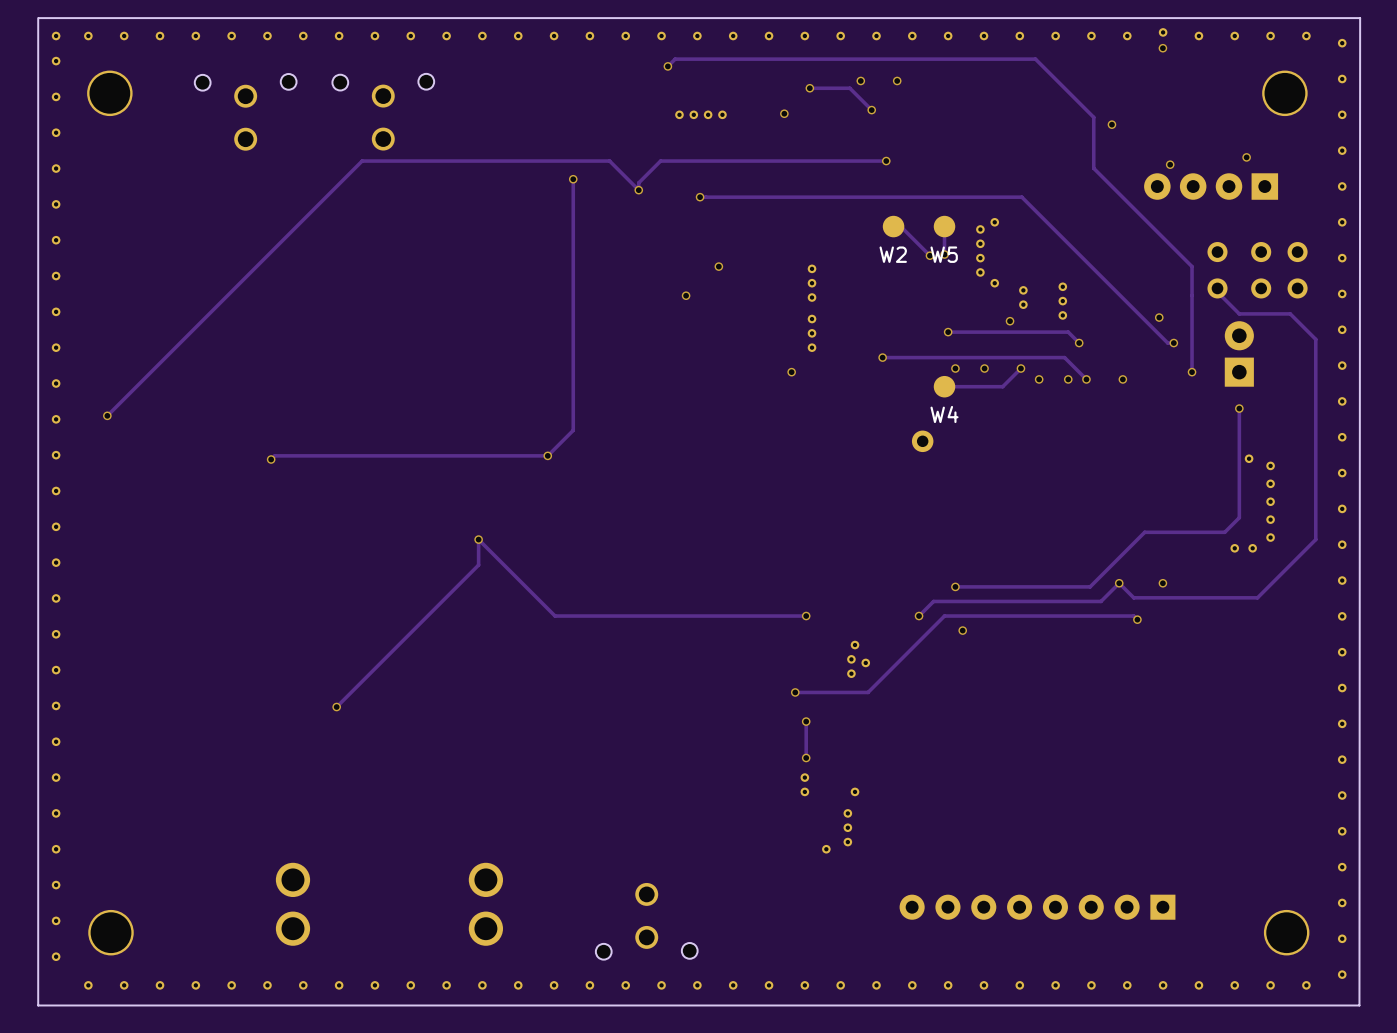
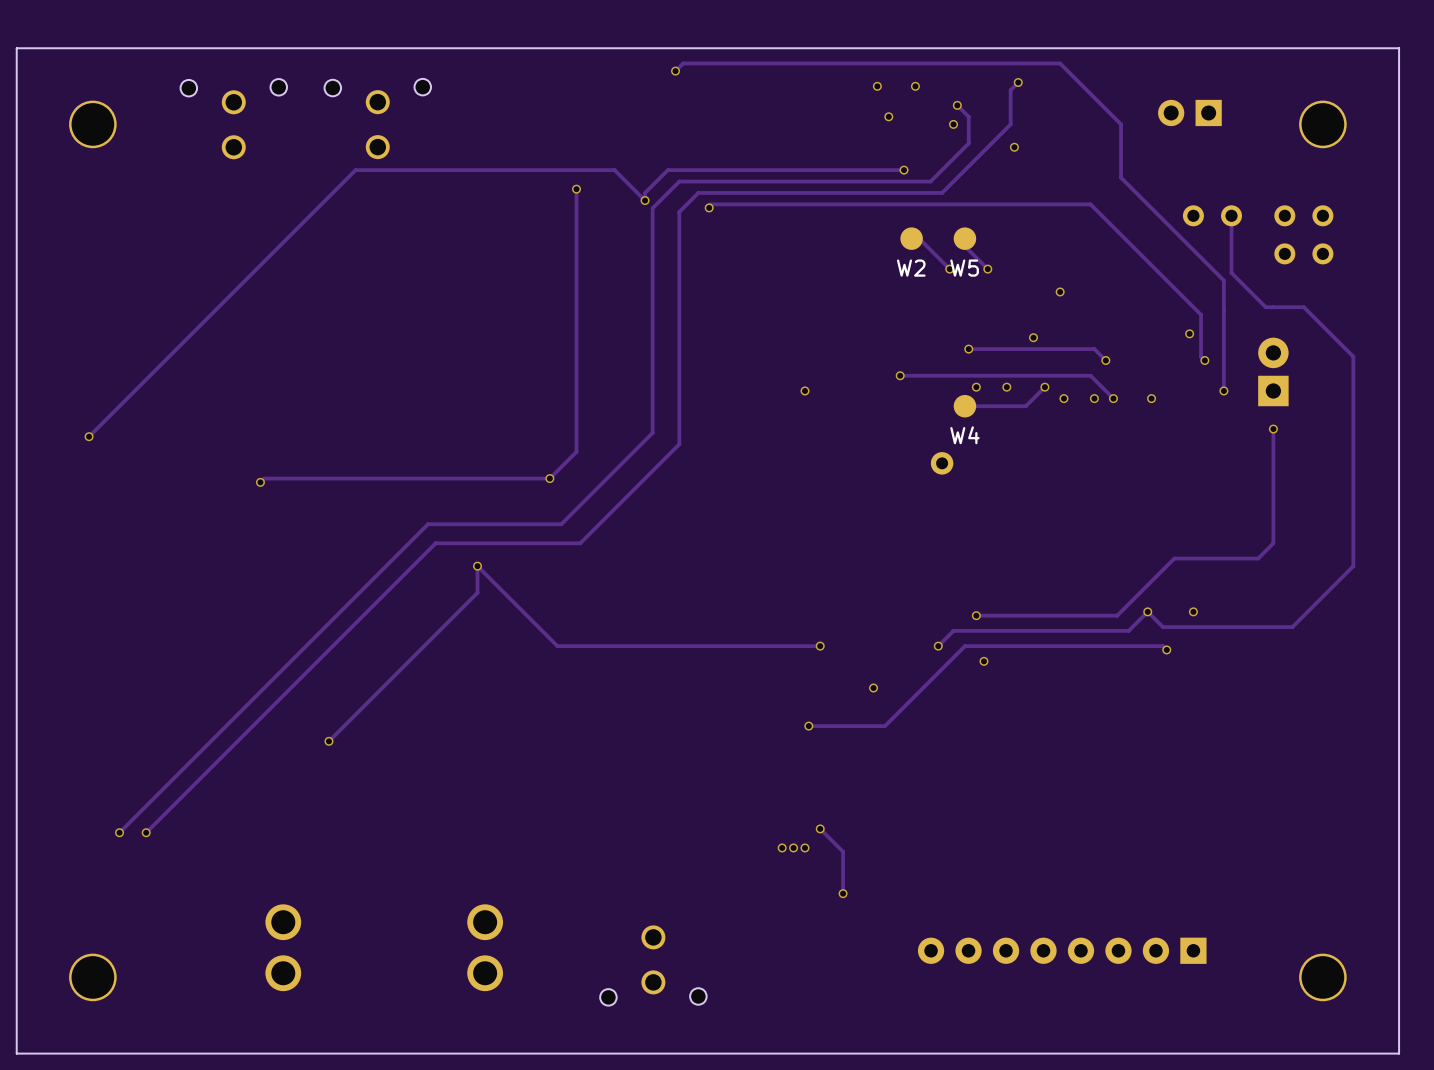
board edge: (38, 18) (1360, 18) (1359, 1005) -> (16, 48) (1399, 48) (1399, 1053)
board edge: (38, 18) (38, 44) -> none
part: (1163, 32) -> none
part: (56, 36) -> none
part: (88, 36) -> none
part: (124, 36) -> none
part: (160, 36) -> none
part: (195, 36) -> none
part: (231, 36) -> none
part: (267, 36) -> none
part: (303, 36) -> none
part: (339, 36) -> none
part: (374, 36) -> none
part: (410, 36) -> none
part: (446, 36) -> none
part: (482, 36) -> none
part: (518, 36) -> none
part: (554, 36) -> none
part: (589, 36) -> none
part: (625, 36) -> none
part: (661, 36) -> none
part: (697, 36) -> none
part: (733, 36) -> none
part: (769, 36) -> none
part: (804, 36) -> none
part: (840, 36) -> none
part: (876, 36) -> none
part: (912, 36) -> none
part: (948, 36) -> none
part: (983, 36) -> none
part: (1019, 36) -> none
part: (1055, 36) -> none
part: (1091, 36) -> none
part: (1127, 36) -> none
part: (1198, 36) -> none
part: (1234, 36) -> none
part: (1270, 36) -> none
part: (1306, 36) -> none
part: (1342, 43) -> none
via: (1162, 48) -> none
part: (56, 61) -> none
track: none -> (1018, 82) (1010, 90) (1010, 124) (942, 192) (698, 192) (679, 212) (679, 444) (580, 543) (435, 543) (146, 832)
via: none -> (1018, 82)
part: (1342, 78) -> none
track: (809, 88) (849, 88) (871, 110) -> none
via: (809, 88) -> none
part position: (109, 93) -> (92, 124)
part position: (1284, 93) -> (1322, 124)
part: (56, 96) -> none
track: none -> (957, 105) (968, 116) (968, 143) (930, 181) (679, 181) (652, 208) (652, 432) (561, 524) (428, 524) (119, 832)
via: none -> (957, 105)
part: none -> (1189, 112)
via: (784, 113) -> none
part: (679, 114) -> none
part: (693, 114) -> none
part: (708, 114) -> none
part: (722, 114) -> none
part: (1342, 114) -> none
via: none -> (953, 124)
via: (1111, 124) -> none
part: (56, 132) -> none
via: none -> (1014, 147)
part: (1342, 150) -> none
via: (1246, 157) -> none
via: (1170, 164) -> none
part: (56, 168) -> none
part: (1211, 186) -> none
part: (1342, 186) -> none
track: (700, 197) (1021, 197) (1167, 343) (1173, 343) -> (709, 204) (1090, 204) (1201, 314) (1201, 356) (1204, 360)
part: (56, 204) -> none
part: none -> (1212, 215)
part: none -> (1303, 215)
part: (994, 222) -> none
part: (1342, 222) -> none
part: (980, 229) -> none
track: (944, 233) (944, 254) -> (964, 246) (987, 269)
part: (56, 240) -> none
part: (980, 243) -> none
part position: (1279, 252) -> (1303, 253)
via position: (944, 254) -> (987, 269)
part: (980, 258) -> none
part: (1342, 258) -> none
via: (718, 266) -> none
part: (812, 268) -> none
part: (1217, 270) -> none
part: (980, 272) -> none
part: (56, 276) -> none
via: none -> (1060, 291)
part: (812, 283) -> none
part: (994, 283) -> none
part: (1062, 286) -> none
track: (1217, 288) (1217, 292) (1239, 313) (1290, 313) -> (1231, 215) (1231, 272) (1265, 307) (1303, 307) (1326, 330)
part: (1279, 288) -> none
part: (1023, 290) -> none
part: (1342, 293) -> none
via: (686, 295) -> none
part: (812, 297) -> none
part: (1062, 301) -> none
part: (1023, 304) -> none
part: (56, 311) -> none
part: (1062, 315) -> none
part: (812, 319) -> none
part: (1342, 329) -> none
part: (812, 333) -> none
part: (56, 347) -> none
part: (812, 347) -> none
part: (1342, 365) -> none
part: (56, 383) -> none
part: (1342, 401) -> none
part: (56, 419) -> none
part: (1342, 437) -> none
part: (56, 455) -> none
part: (1249, 458) -> none
part: (1270, 465) -> none
part: (1342, 473) -> none
part: (1270, 483) -> none
part: (56, 490) -> none
part: (1270, 501) -> none
part: (1342, 508) -> none
part: (1270, 519) -> none
part: (56, 526) -> none
part: (1270, 537) -> none
part: (1342, 544) -> none
part: (1234, 548) -> none
part: (1252, 548) -> none
part: (56, 562) -> none
part: (1342, 580) -> none
part: (56, 598) -> none
part: (1342, 616) -> none
part: (56, 634) -> none
part: (855, 645) -> none
part: (1342, 652) -> none
via: none -> (873, 688)
part: (851, 659) -> none
part: (865, 662) -> none
part: (56, 670) -> none
part: (851, 673) -> none
part: (1342, 688) -> none
part: (56, 705) -> none
track: (806, 721) (806, 757) -> none
via: (806, 721) -> none
part: (1342, 723) -> none
part: (56, 741) -> none
via: (806, 757) -> none
part: (1342, 759) -> none
part: (56, 777) -> none
part: (804, 777) -> none
track: none -> (820, 828) (843, 851) (843, 893)
via: none -> (820, 828)
part: (804, 791) -> none
part: (855, 791) -> none
via: none -> (119, 832)
via: none -> (146, 832)
part: (1342, 795) -> none
via: none -> (782, 847)
via: none -> (793, 847)
via: none -> (805, 847)
part: (56, 813) -> none
part: (847, 813) -> none
part: (847, 827) -> none
part: (1342, 831) -> none
part: (847, 842) -> none
part: (56, 849) -> none
part: (826, 849) -> none
via: none -> (843, 893)
part: (1342, 867) -> none
part: (56, 885) -> none
part: (1342, 902) -> none
part: (56, 920) -> none
part: (1342, 938) -> none
part: (56, 956) -> none
part: (1342, 974) -> none
part: (88, 985) -> none
part: (124, 985) -> none
part: (160, 985) -> none
part: (195, 985) -> none
part: (231, 985) -> none
part: (267, 985) -> none
part: (303, 985) -> none
part: (339, 985) -> none
part: (374, 985) -> none
part: (410, 985) -> none
part: (446, 985) -> none
part: (482, 985) -> none
part: (518, 985) -> none
part: (554, 985) -> none
part: (589, 985) -> none
part: (625, 985) -> none
part: (661, 985) -> none
part: (697, 985) -> none
part: (733, 985) -> none
part: (769, 985) -> none
part: (804, 985) -> none
part: (840, 985) -> none
part: (876, 985) -> none
part: (912, 985) -> none
part: (948, 985) -> none
part: (983, 985) -> none
part: (1019, 985) -> none
part: (1055, 985) -> none
part: (1091, 985) -> none
part: (1127, 985) -> none
part: (1163, 985) -> none
part: (1198, 985) -> none
part: (1234, 985) -> none
part: (1270, 985) -> none
part: (1306, 985) -> none

